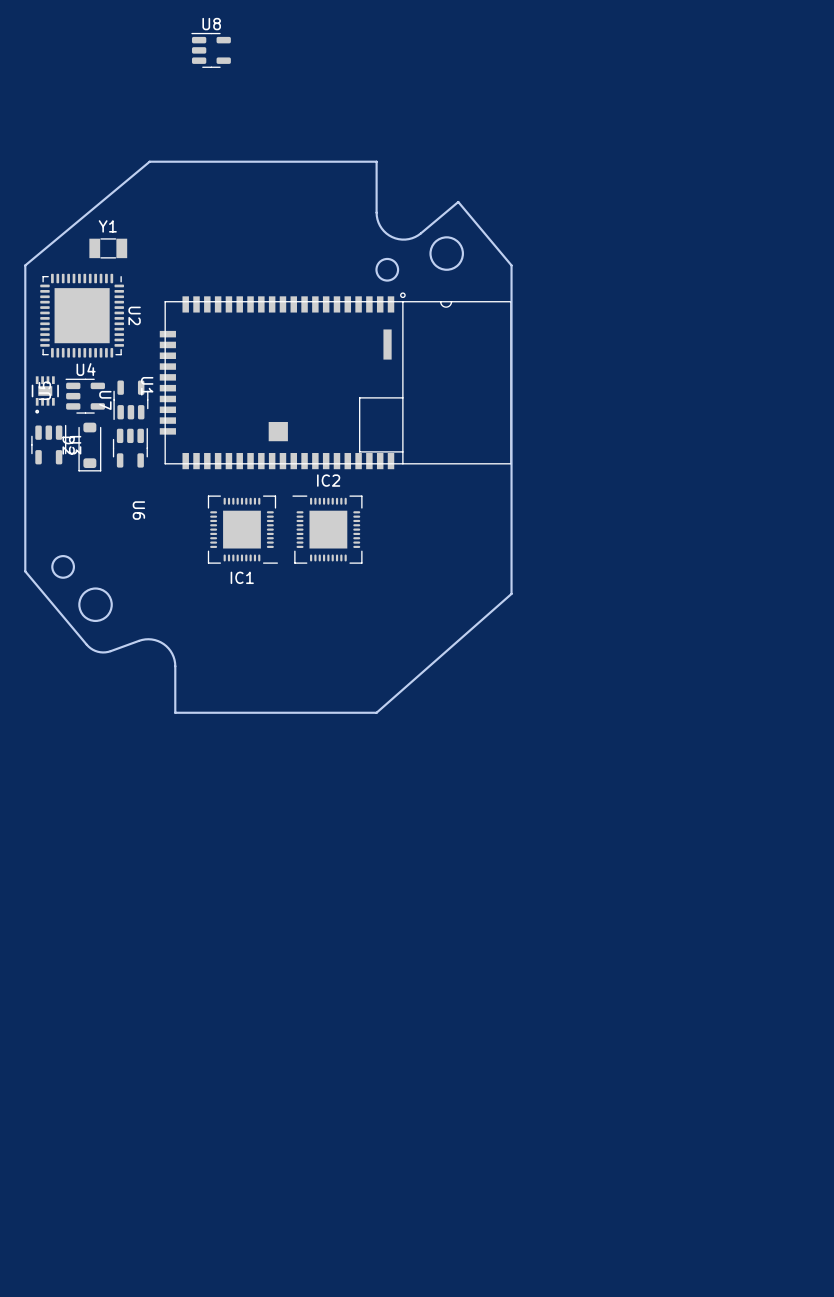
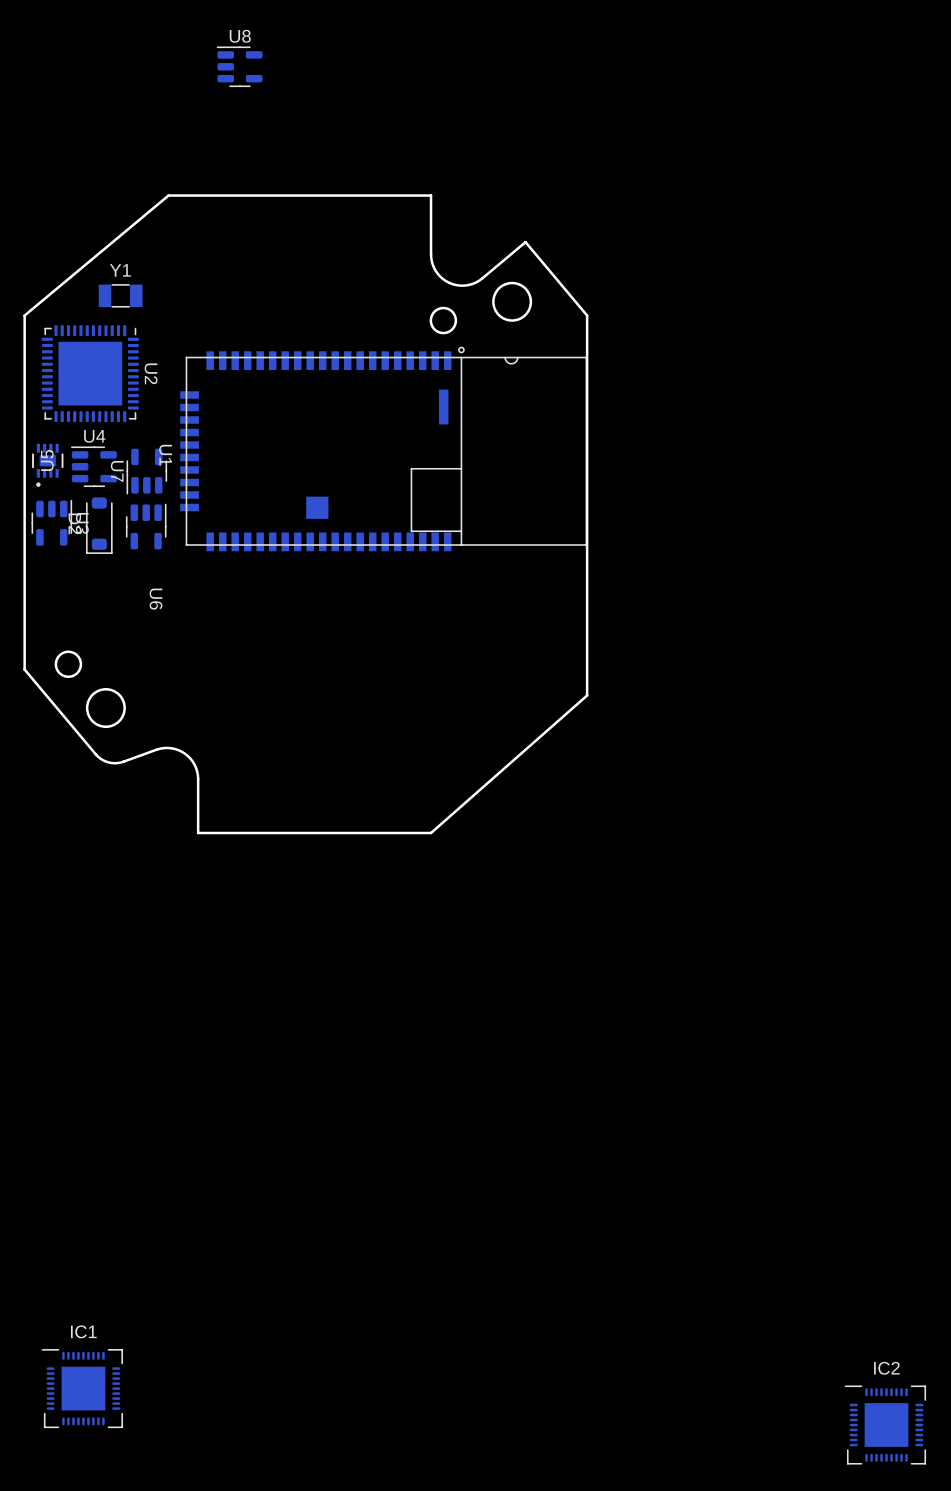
IC1 rotation: 0° (242, 529) -> 180° (82, 1388)
IC1 position: (242, 529) -> (82, 1388)
IC2 position: (327, 529) -> (885, 1425)

